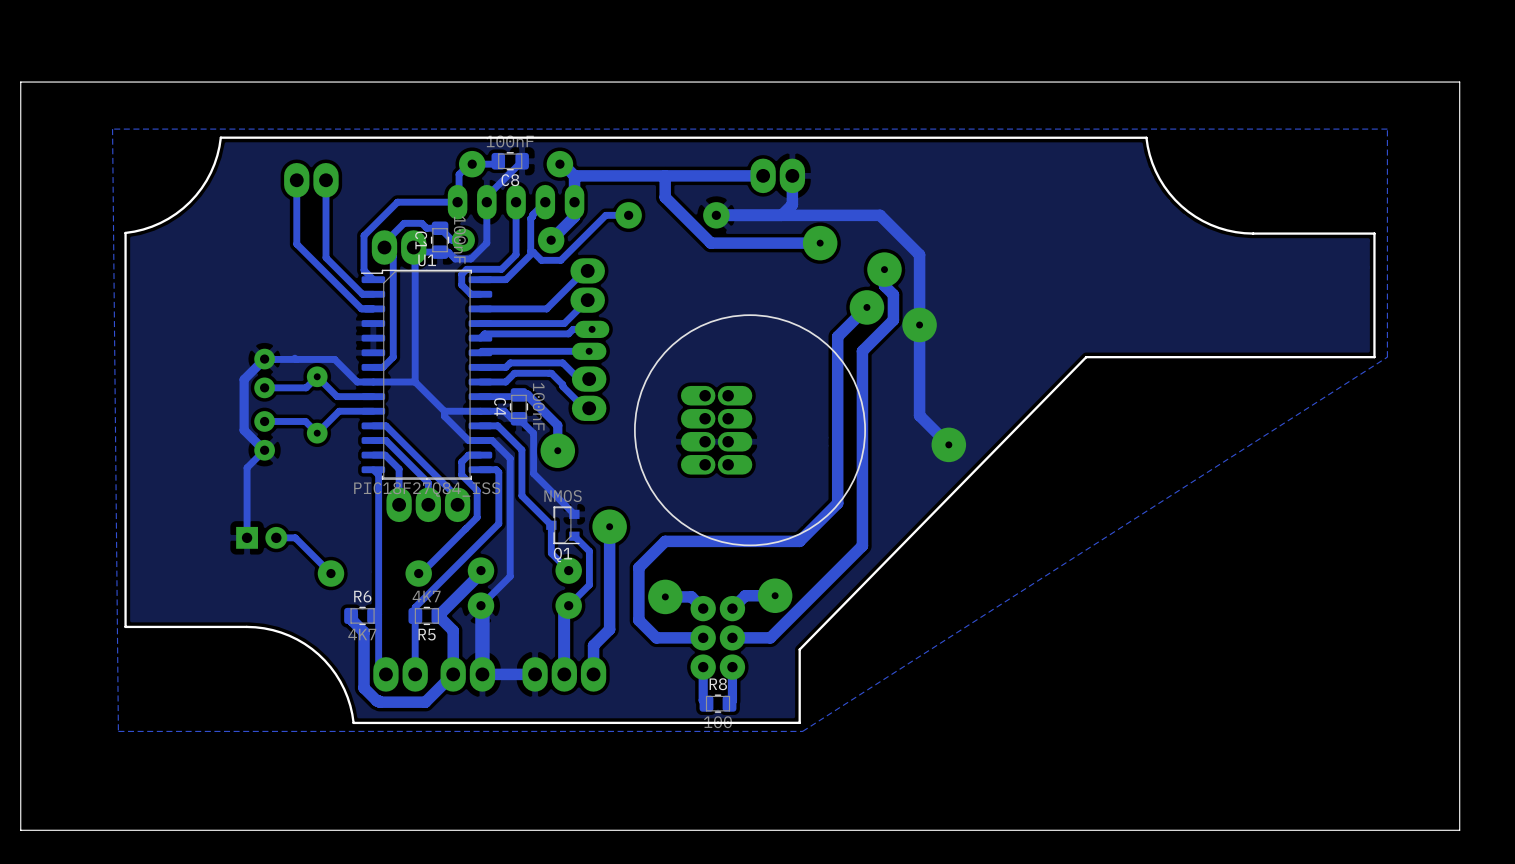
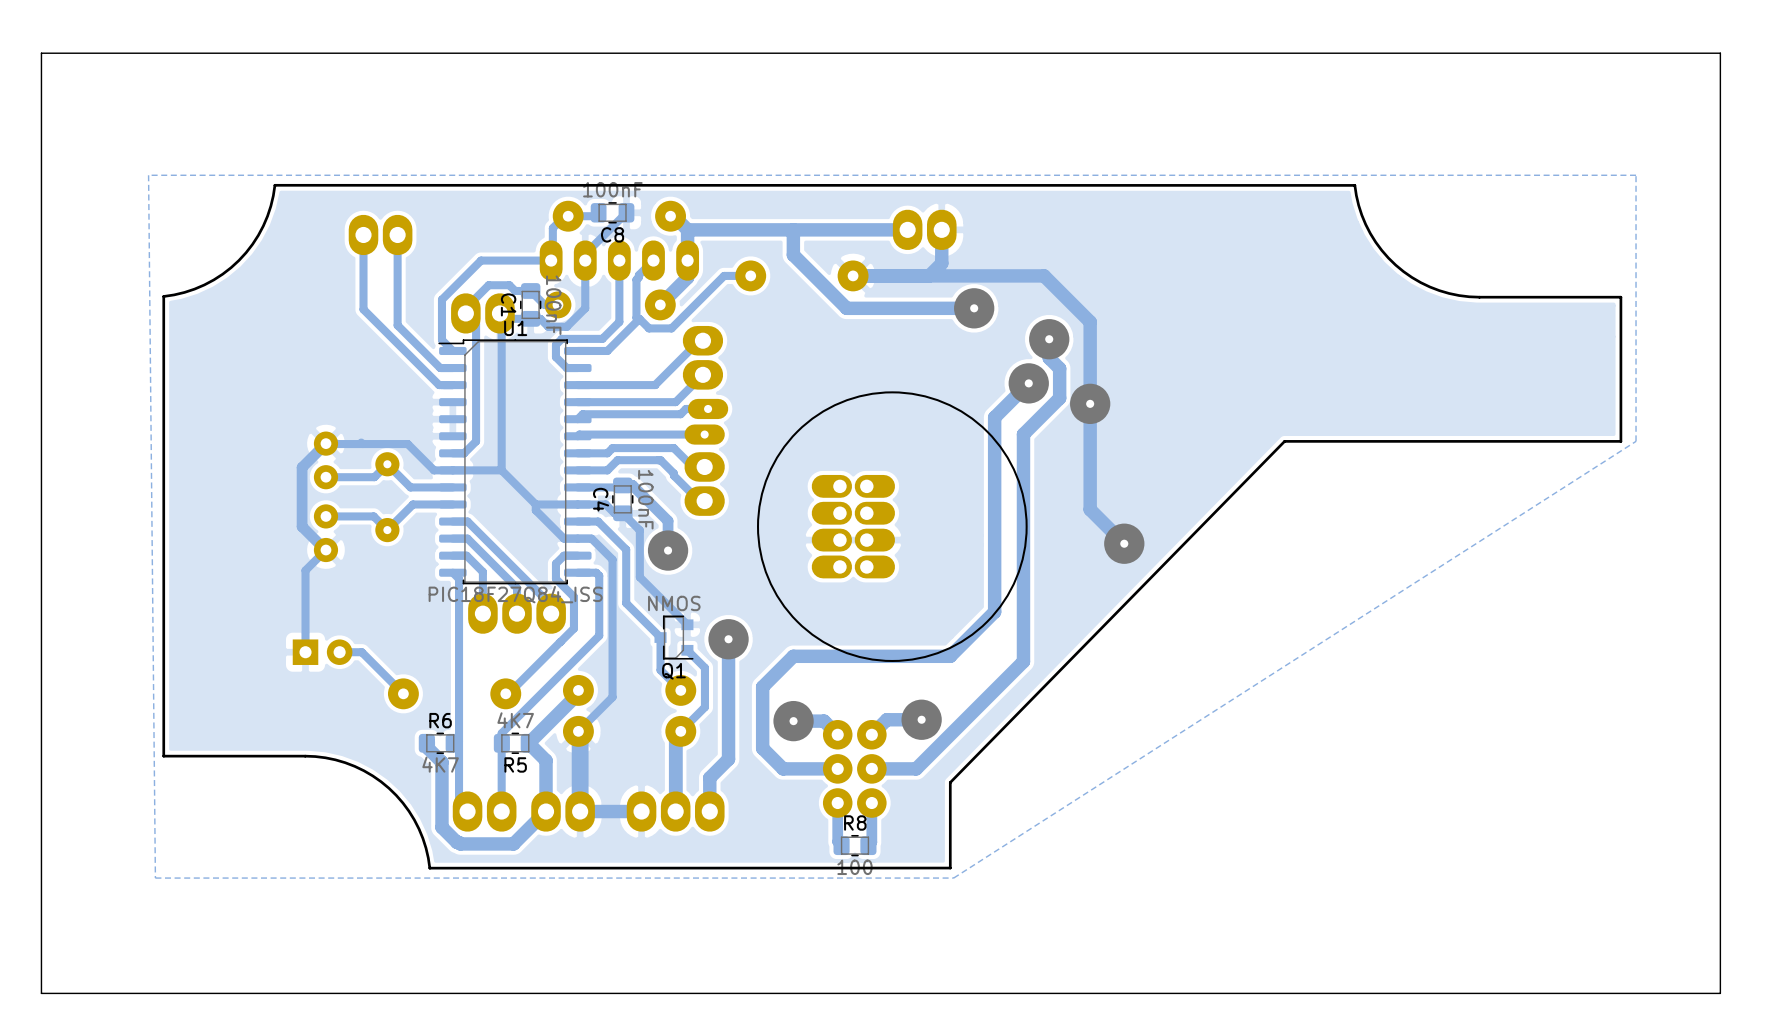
board edge: (1459, 82) (20, 82) -> (1720, 120) (1720, 53) (41, 53) (41, 120)

